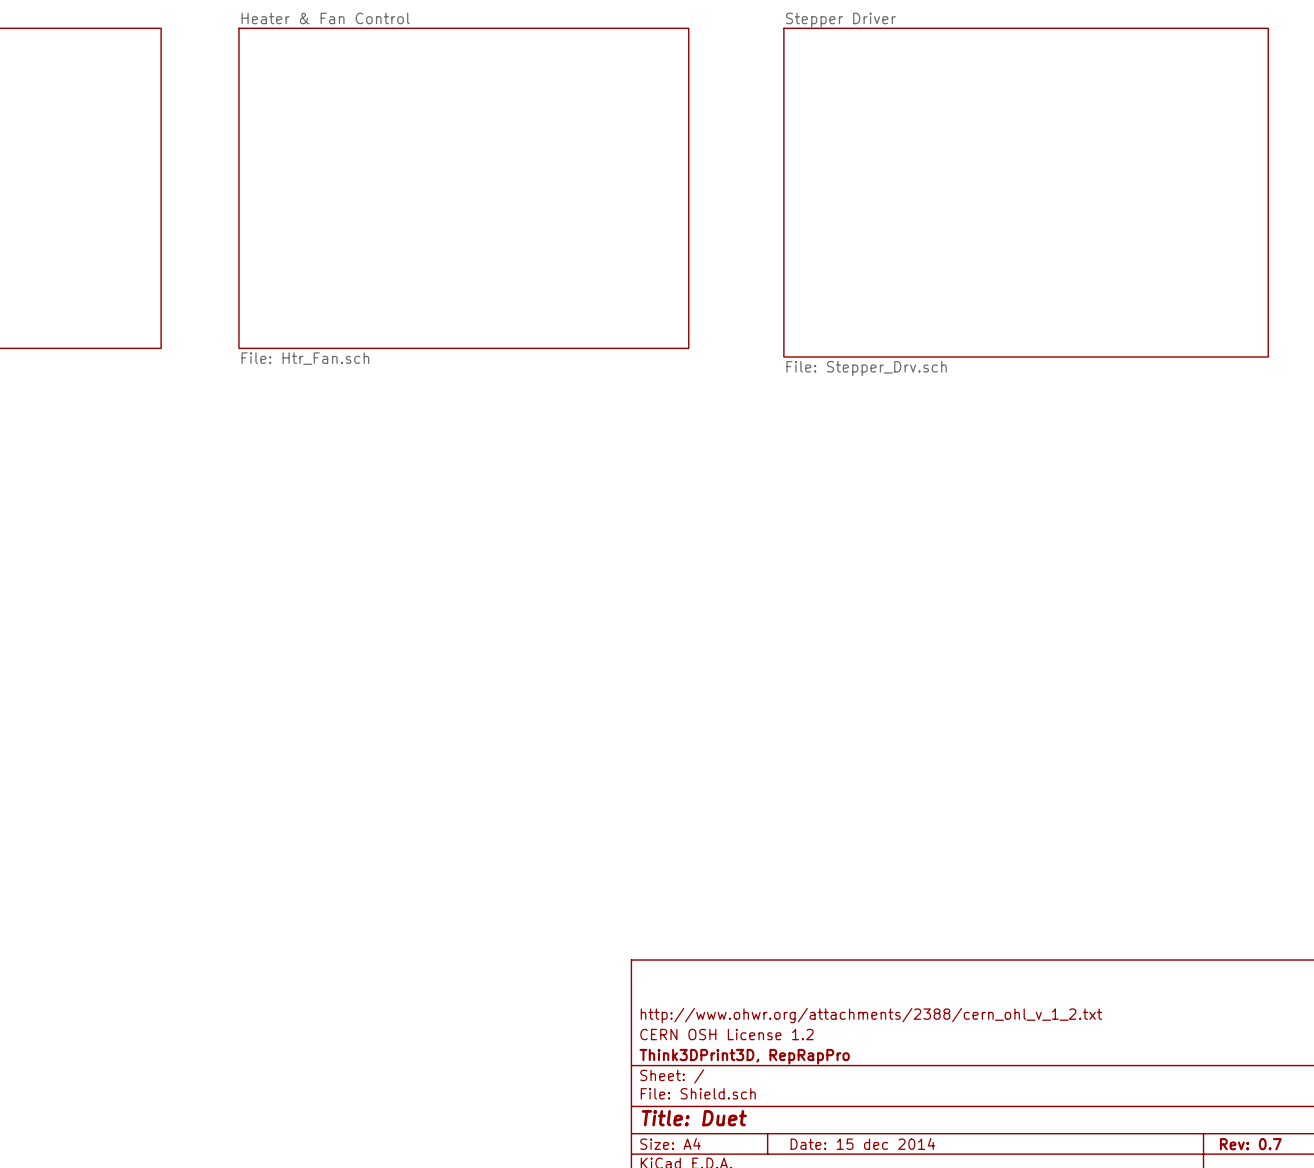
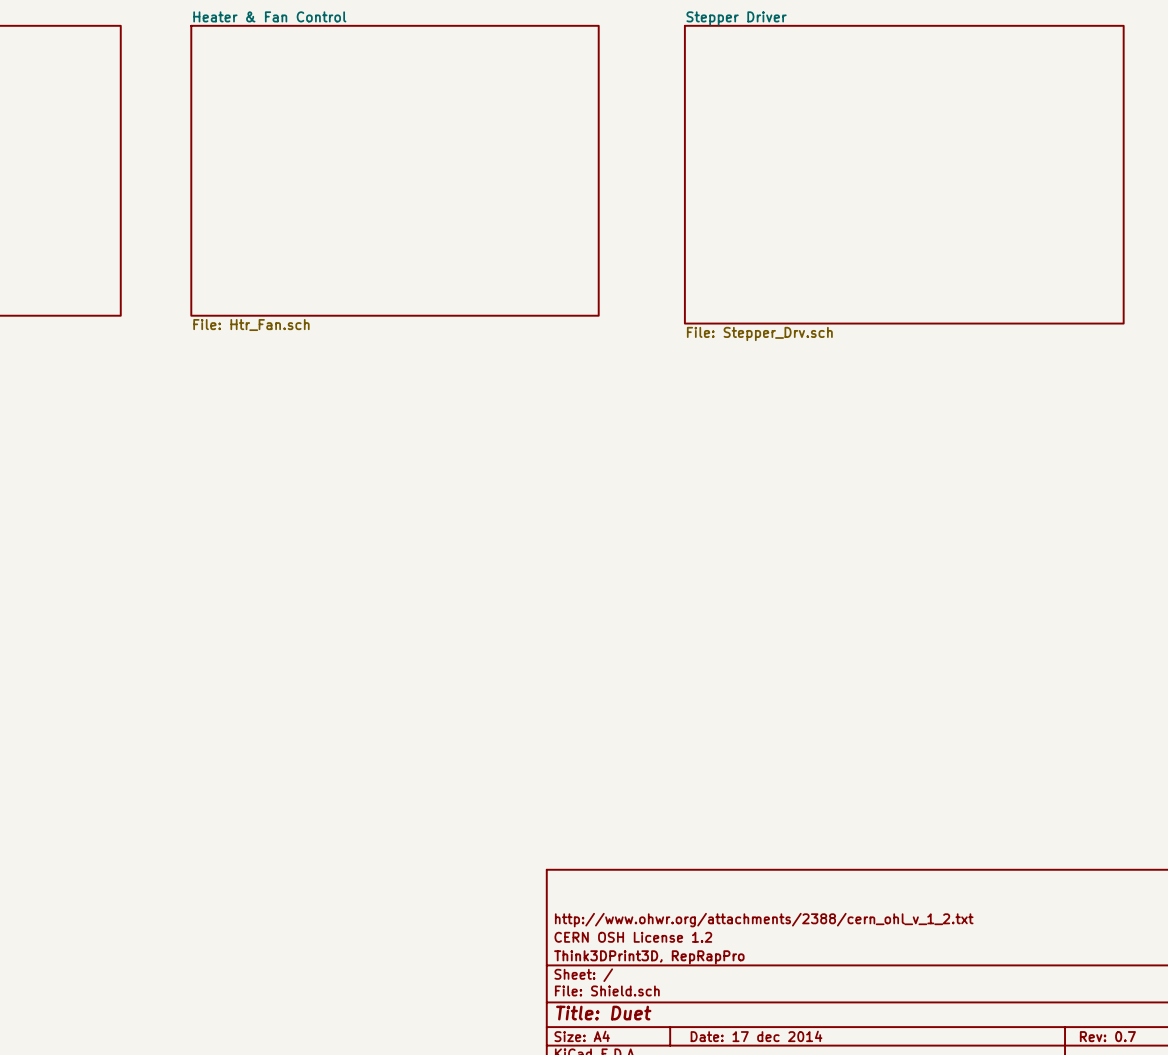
title block: Date: 15 dec 2014 (862, 1143) -> Date: 17 dec 2014 (756, 1036)

